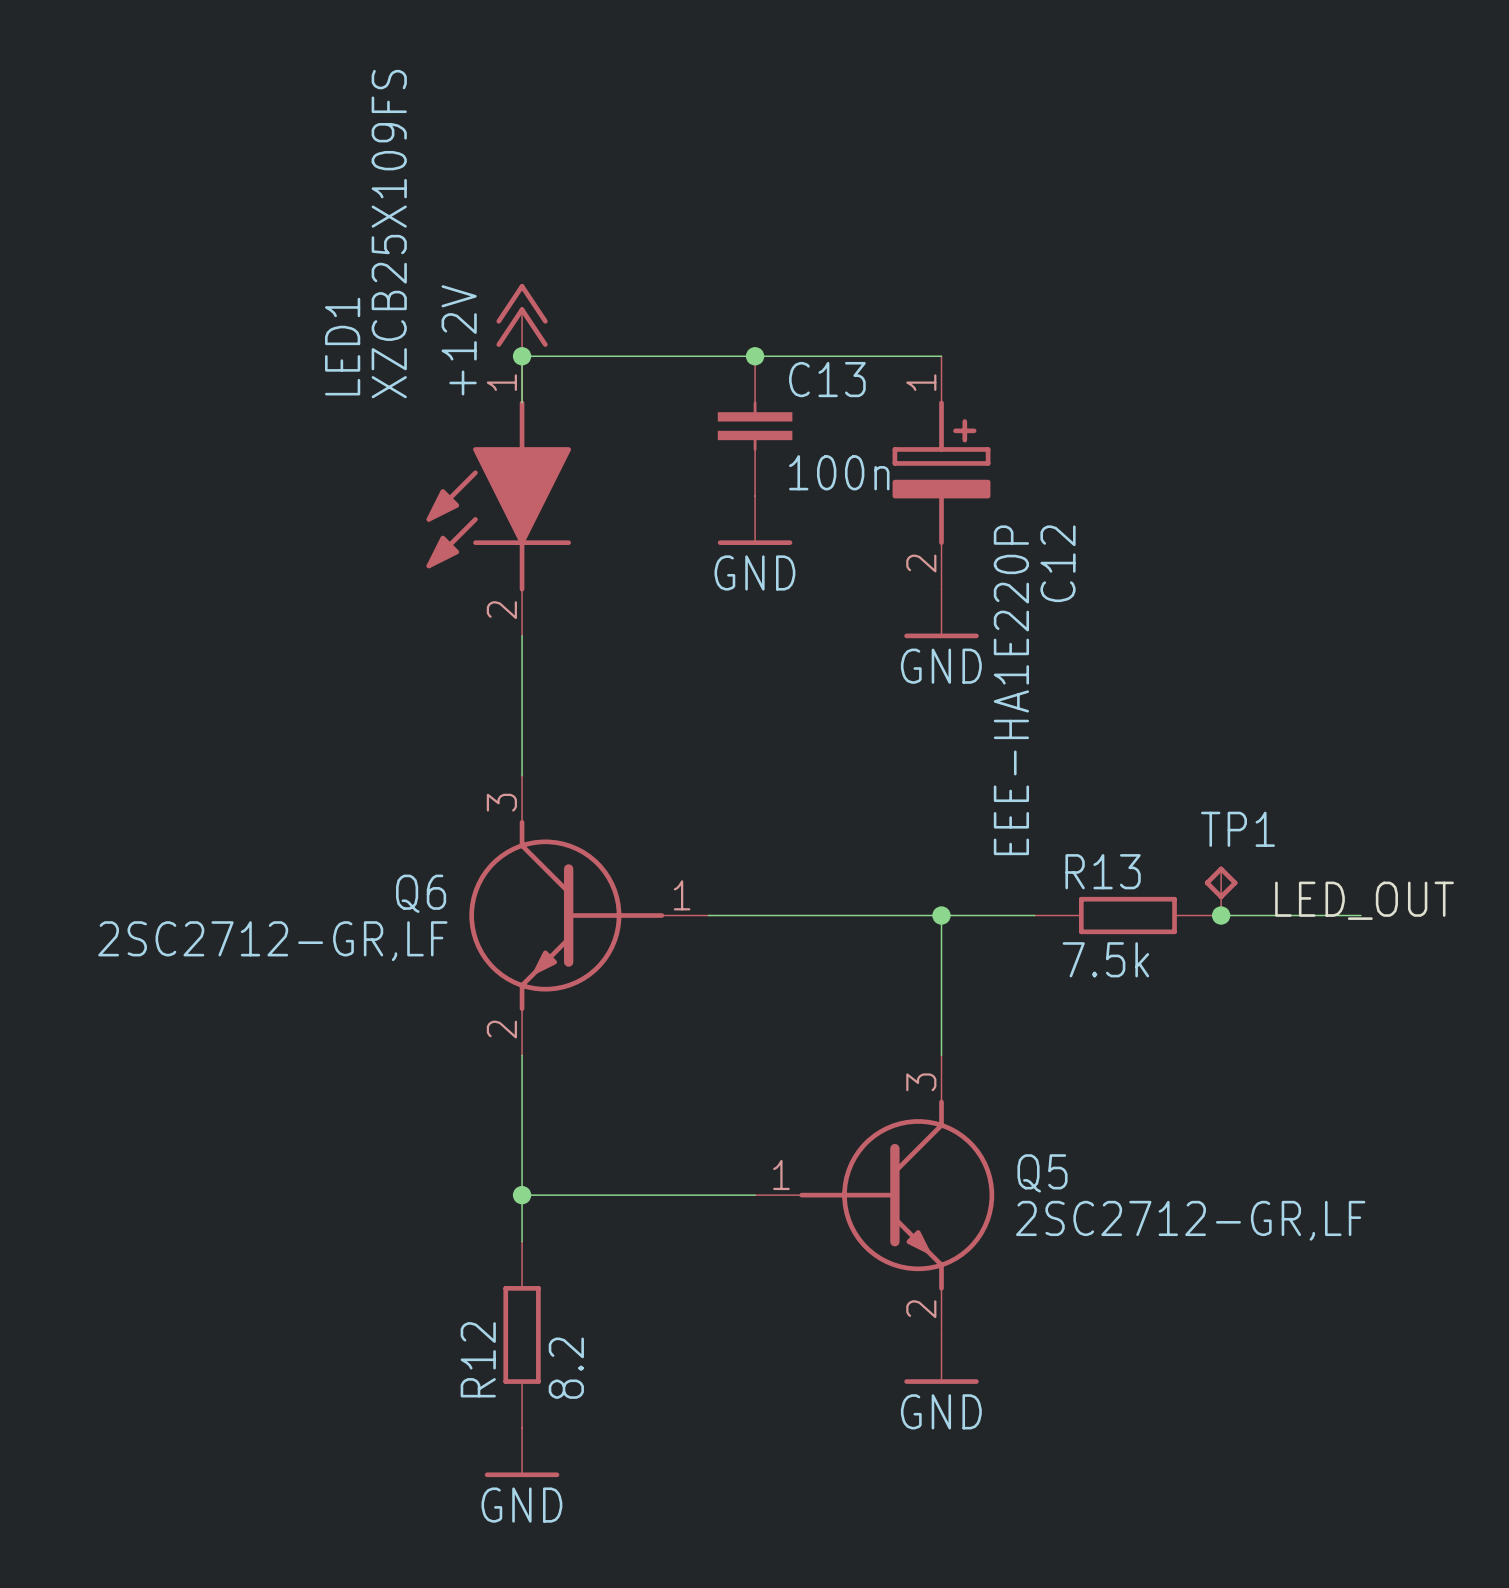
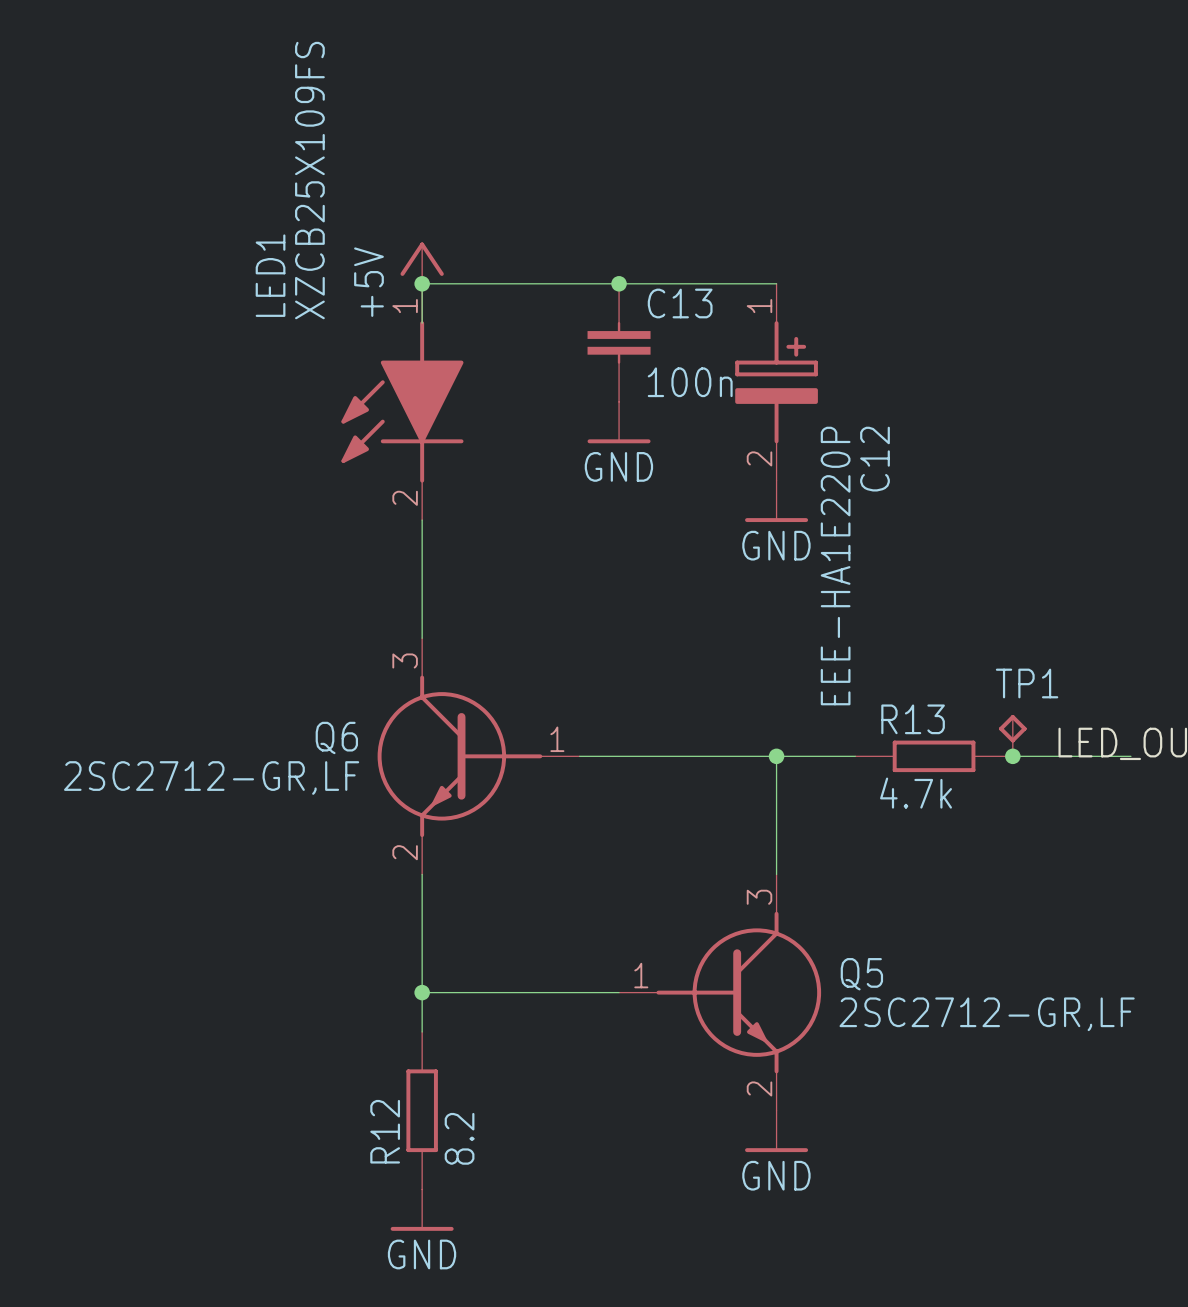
power symbol: +12V (522, 320) -> +5V (422, 263)
R13 value: 7.5k (1105, 959) -> 4.7k (916, 793)

